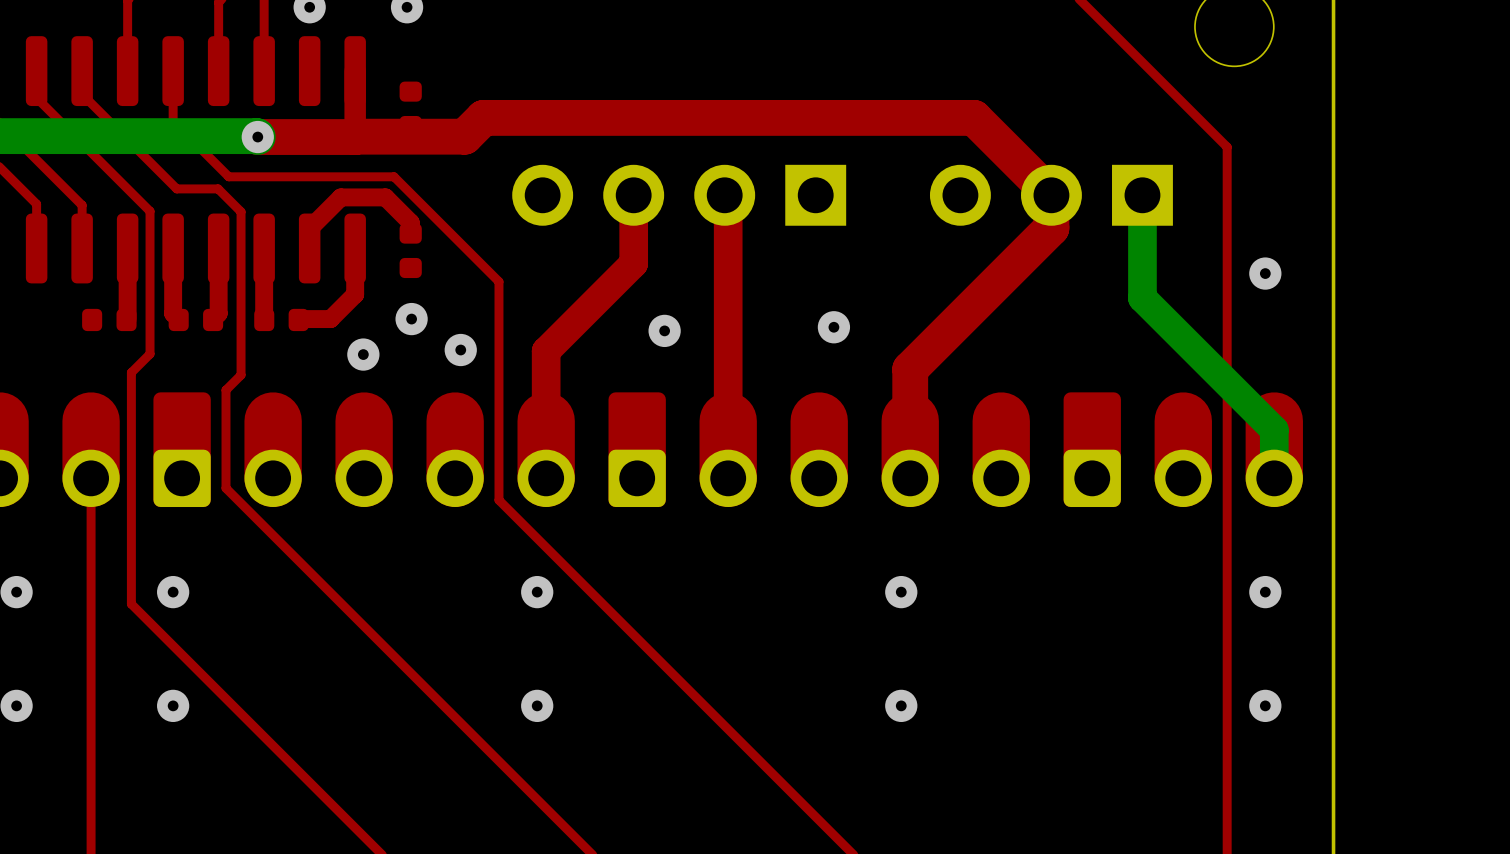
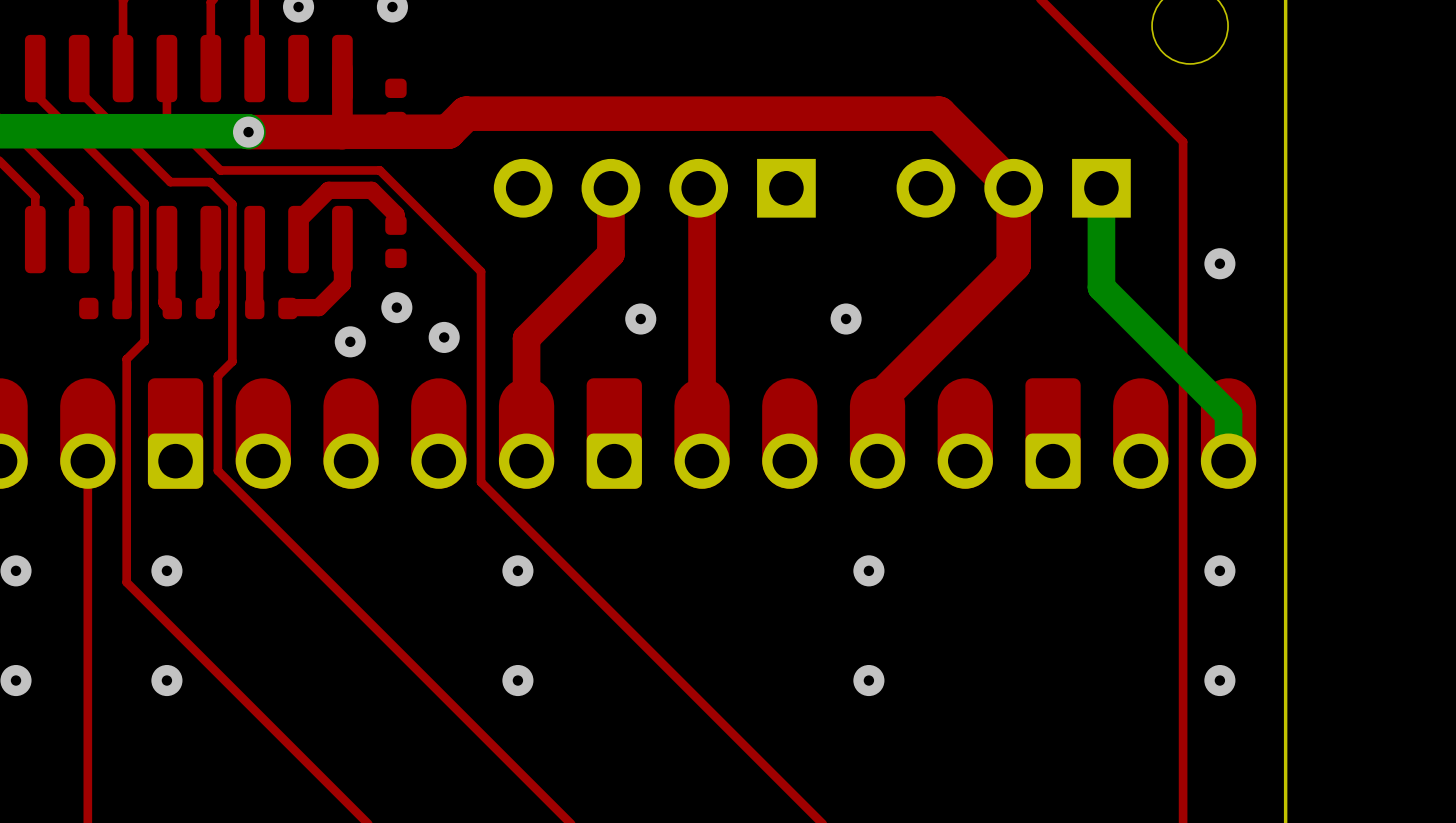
top track: (1051, 228) (910, 369) (910, 415) -> (1013, 219) (1013, 264) (877, 400)
via position: (833, 327) -> (846, 319)

